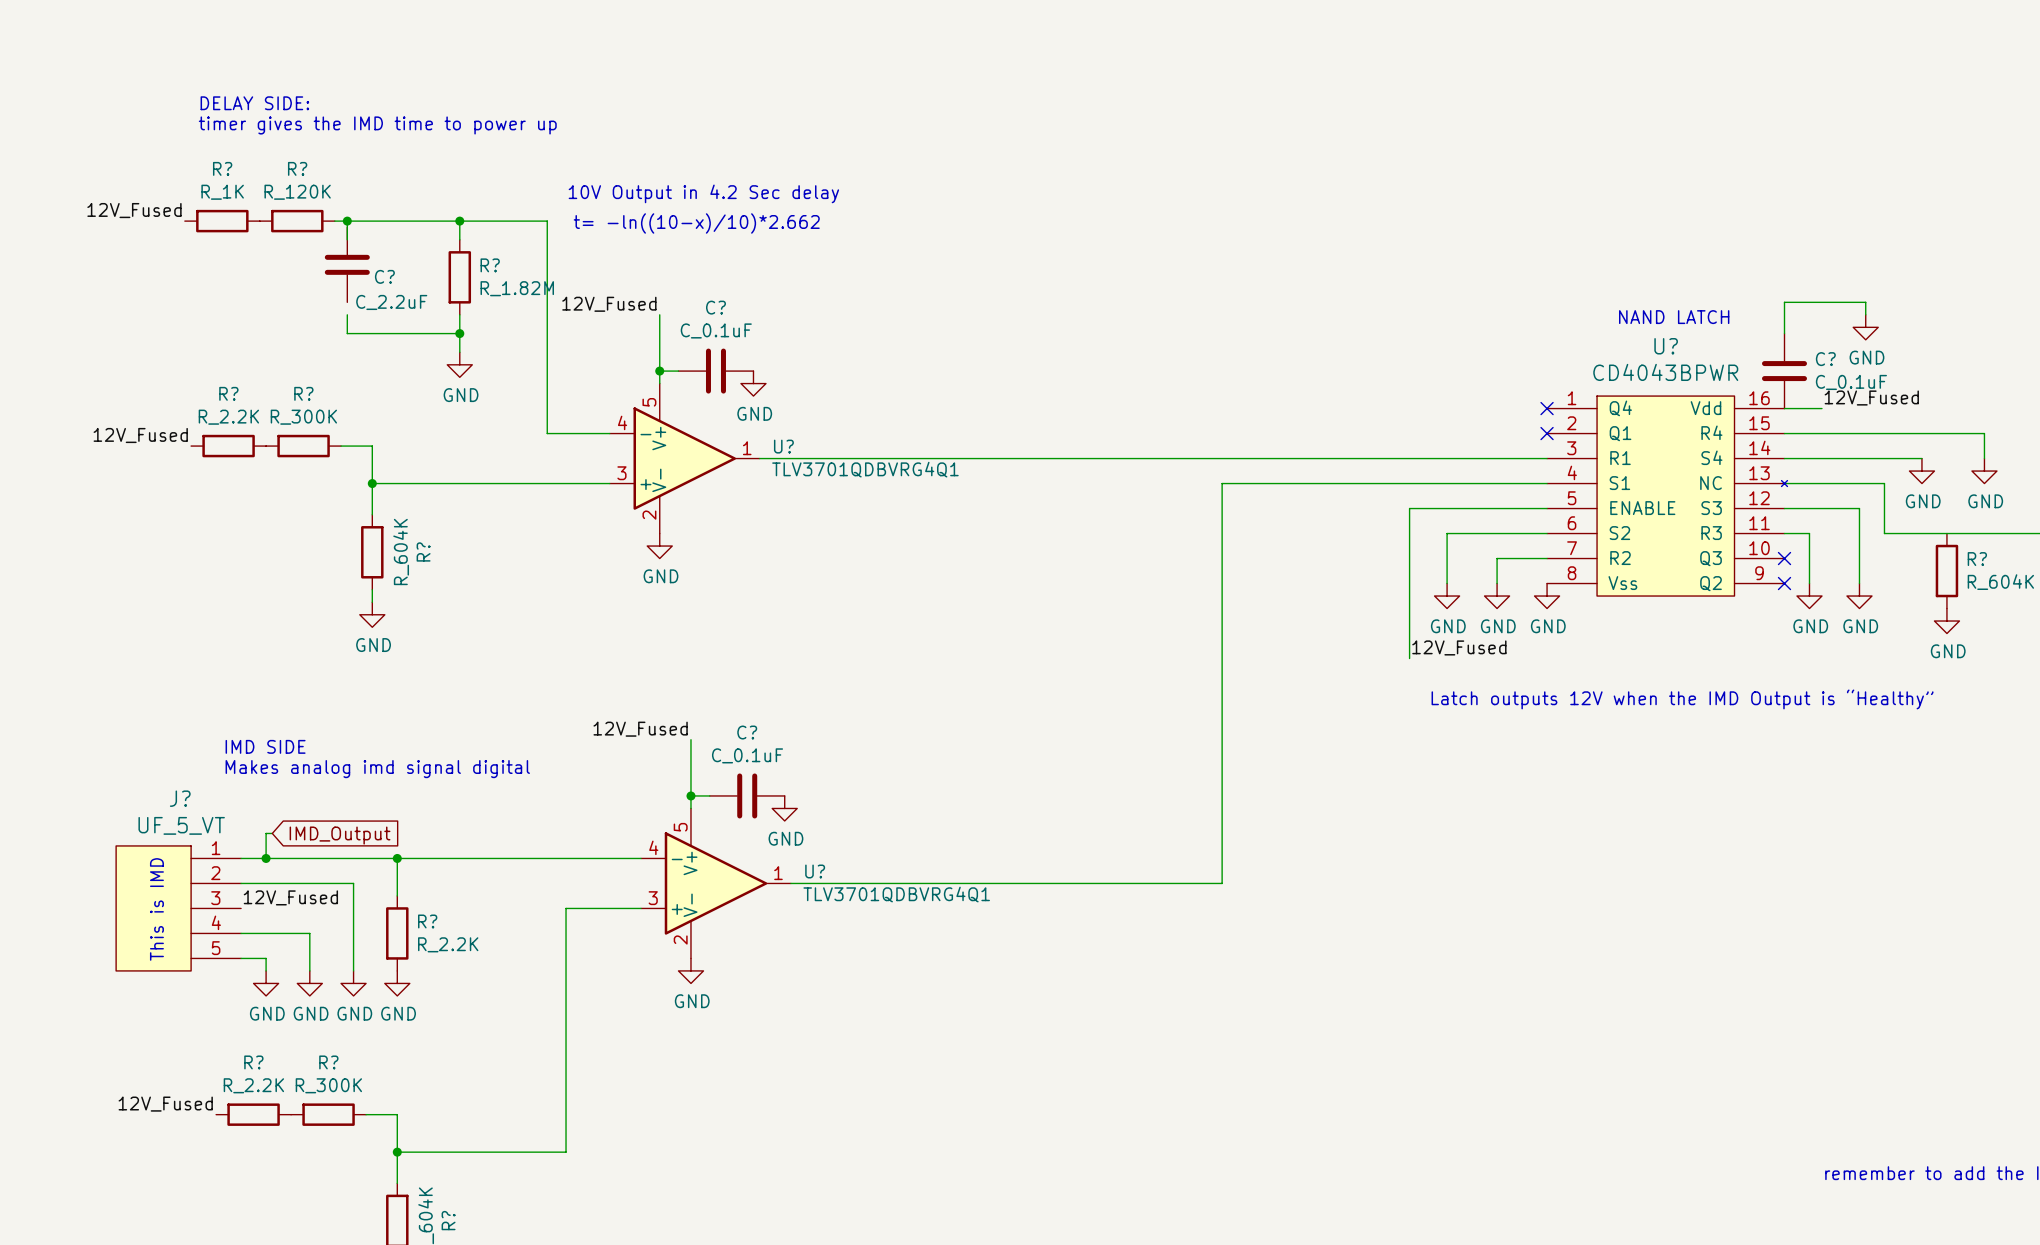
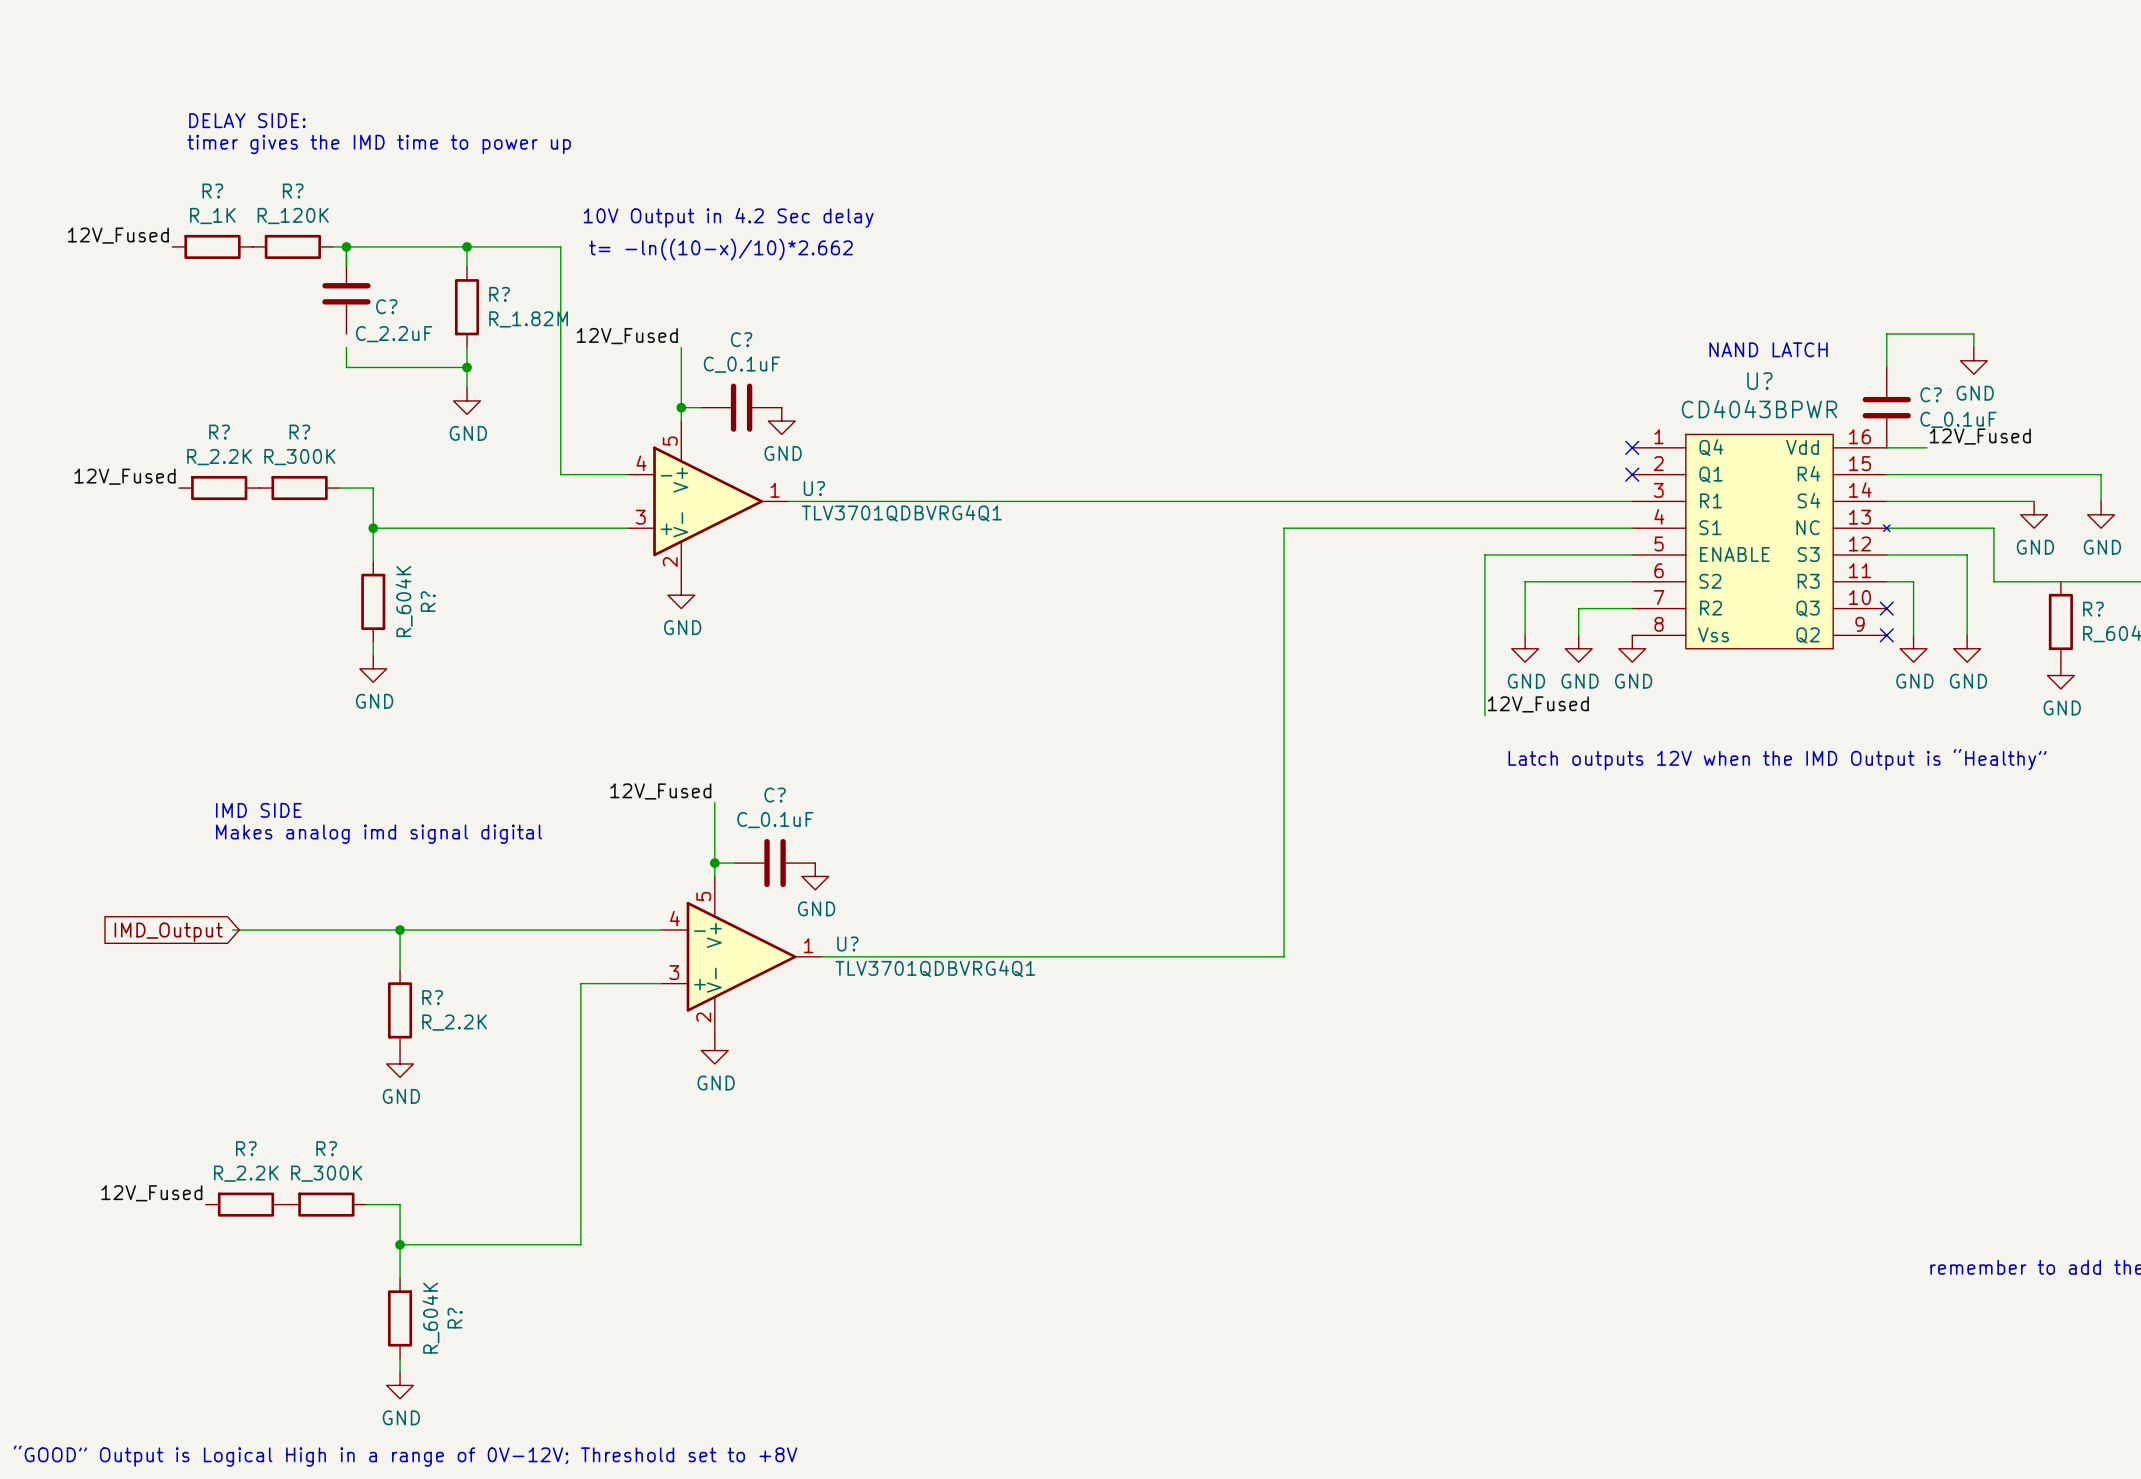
wire: (272, 833) (266, 833) (266, 858) -> none
global label rotation: 0° (340, 835) -> 180° (168, 932)
global label position: IMD_Output (340, 835) -> IMD_Output (168, 932)
junction: (266, 858) -> none
wire: (241, 883) (353, 883) (353, 970) -> none
label: 12V_Fused (290, 897) -> none
J?: UF_5_VT (178, 908) -> none
text: This is IMD (156, 909) -> none
wire: (241, 933) (309, 933) (309, 970) -> none
wire: (241, 958) (266, 958) (266, 970) -> none
power symbol: GND (266, 983) -> none
power symbol: GND (309, 983) -> none
power symbol: GND (353, 983) -> none

